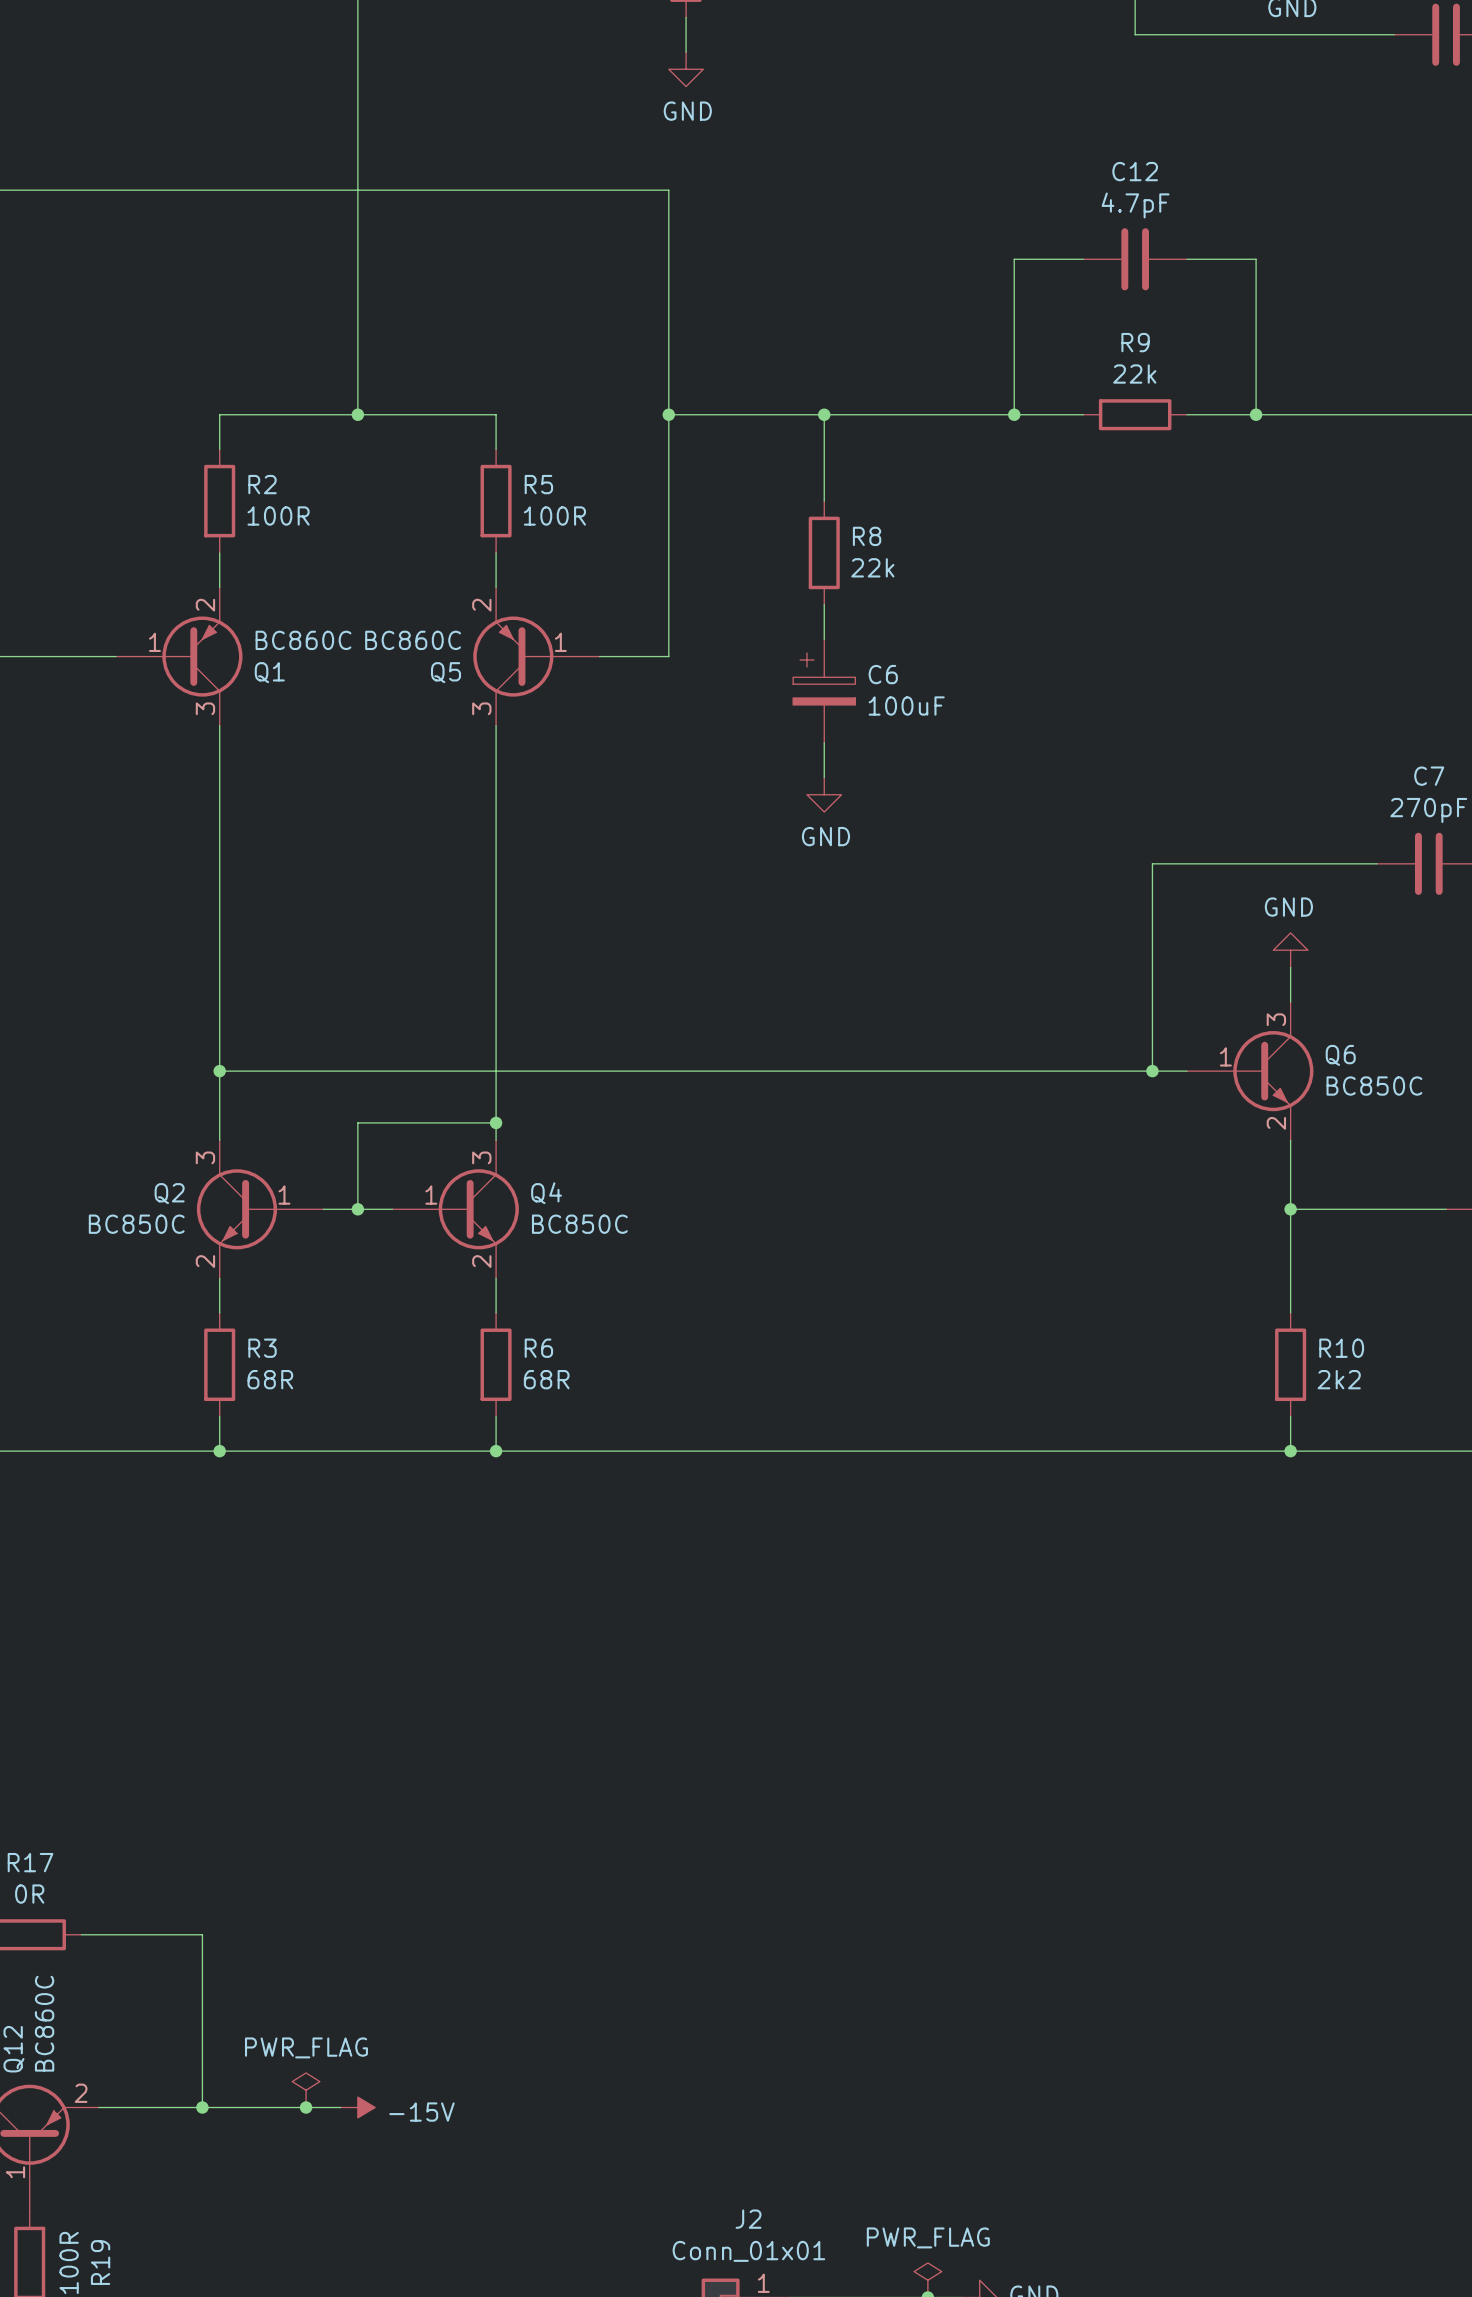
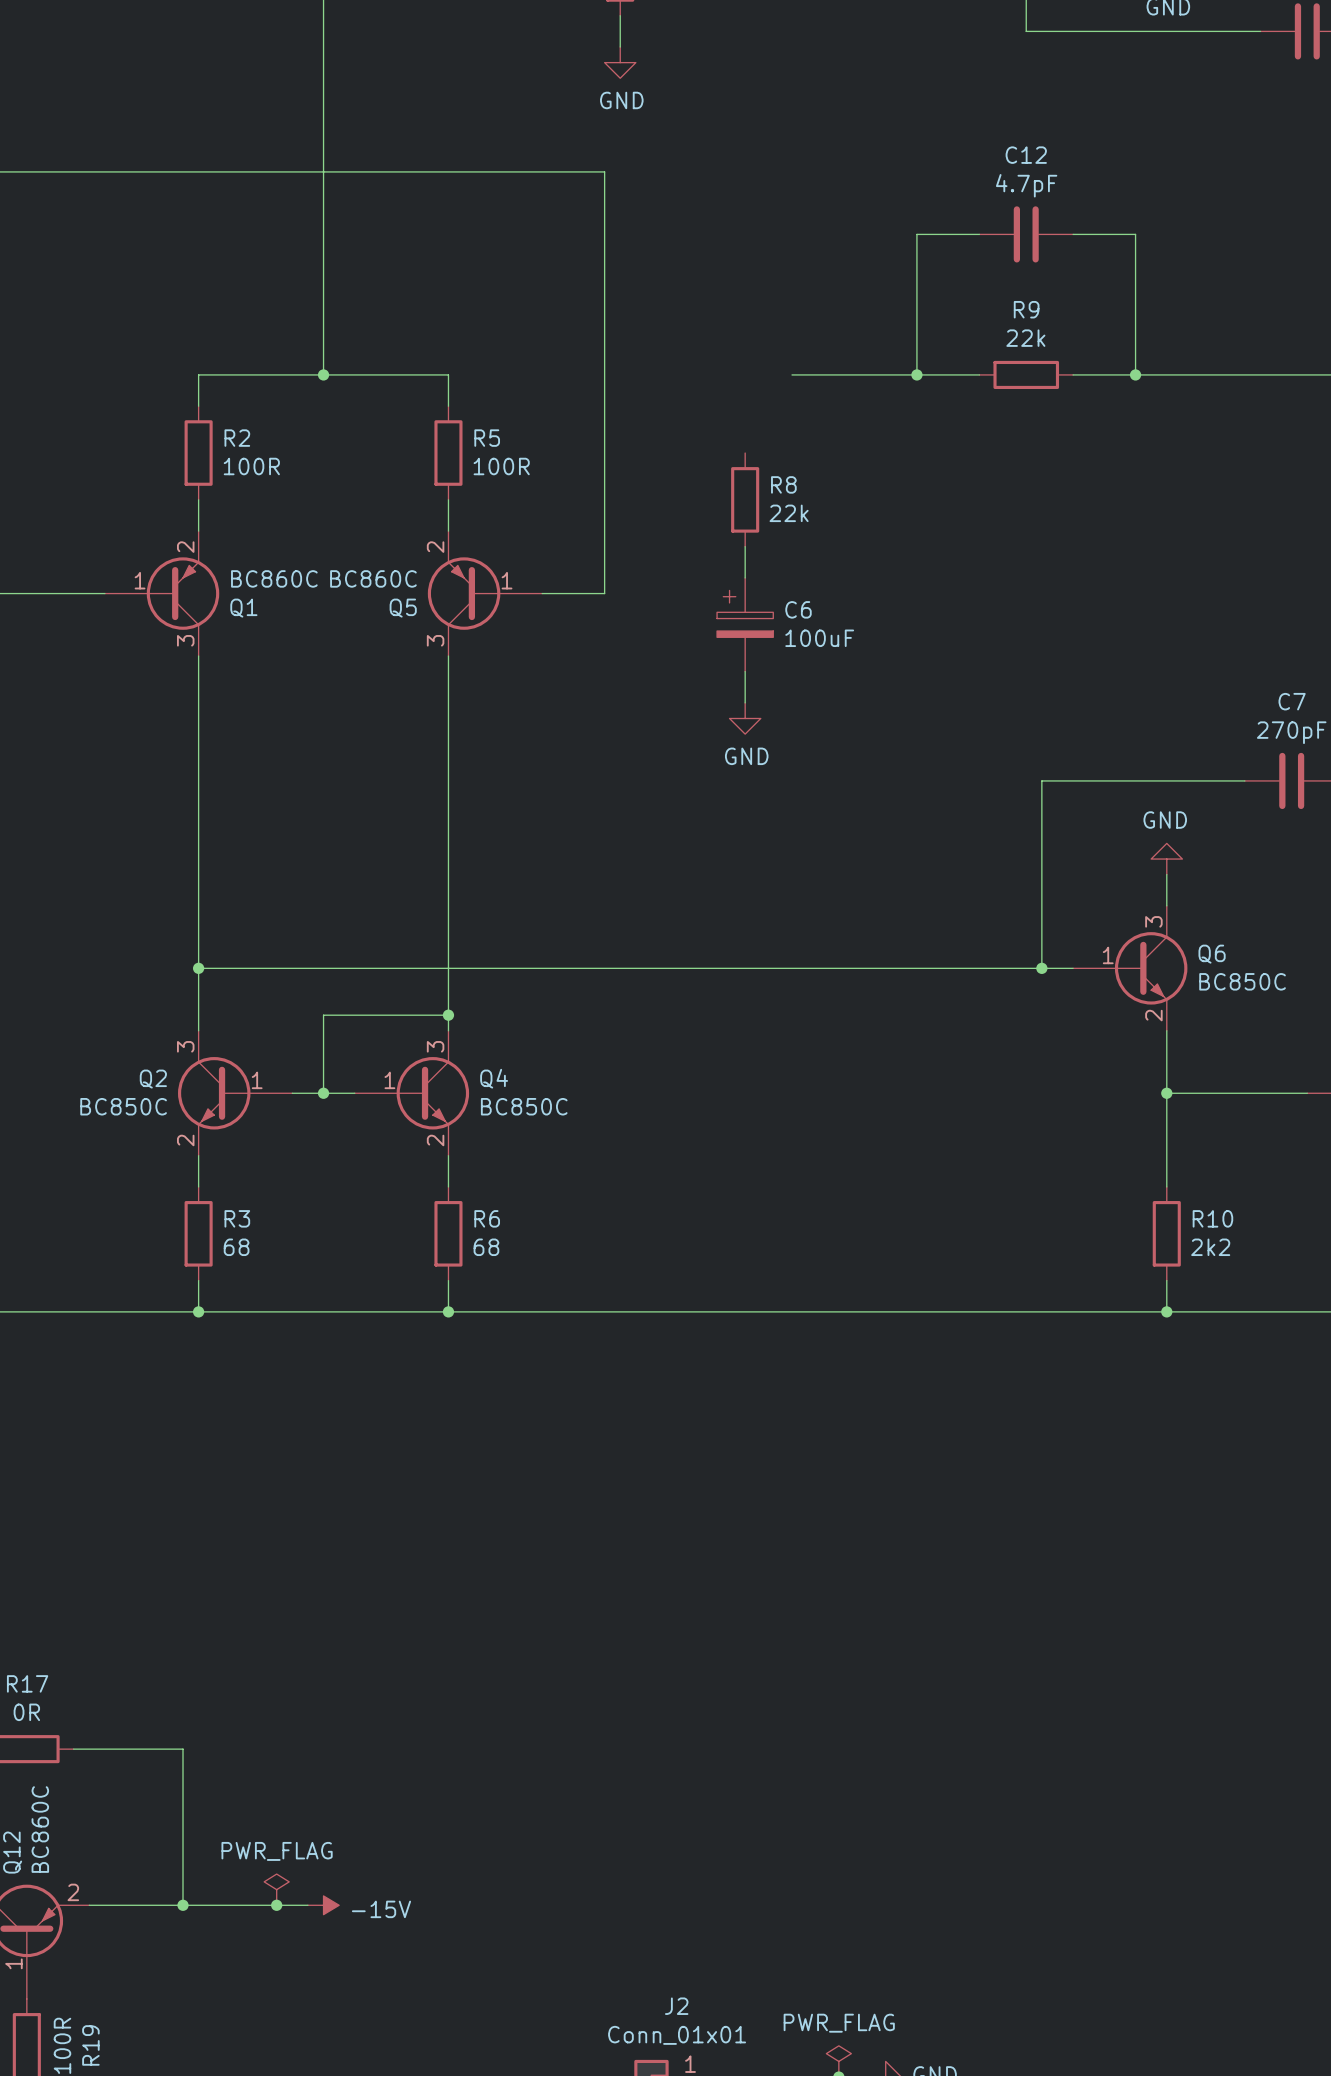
wire: (668, 414) (876, 414) -> none
junction: (668, 414) -> none
wire: (824, 414) (824, 501) -> none
junction: (824, 414) -> none
R3 value: 68R (270, 1379) -> 68 (236, 1247)
R6 value: 68R (546, 1379) -> 68 (486, 1247)

